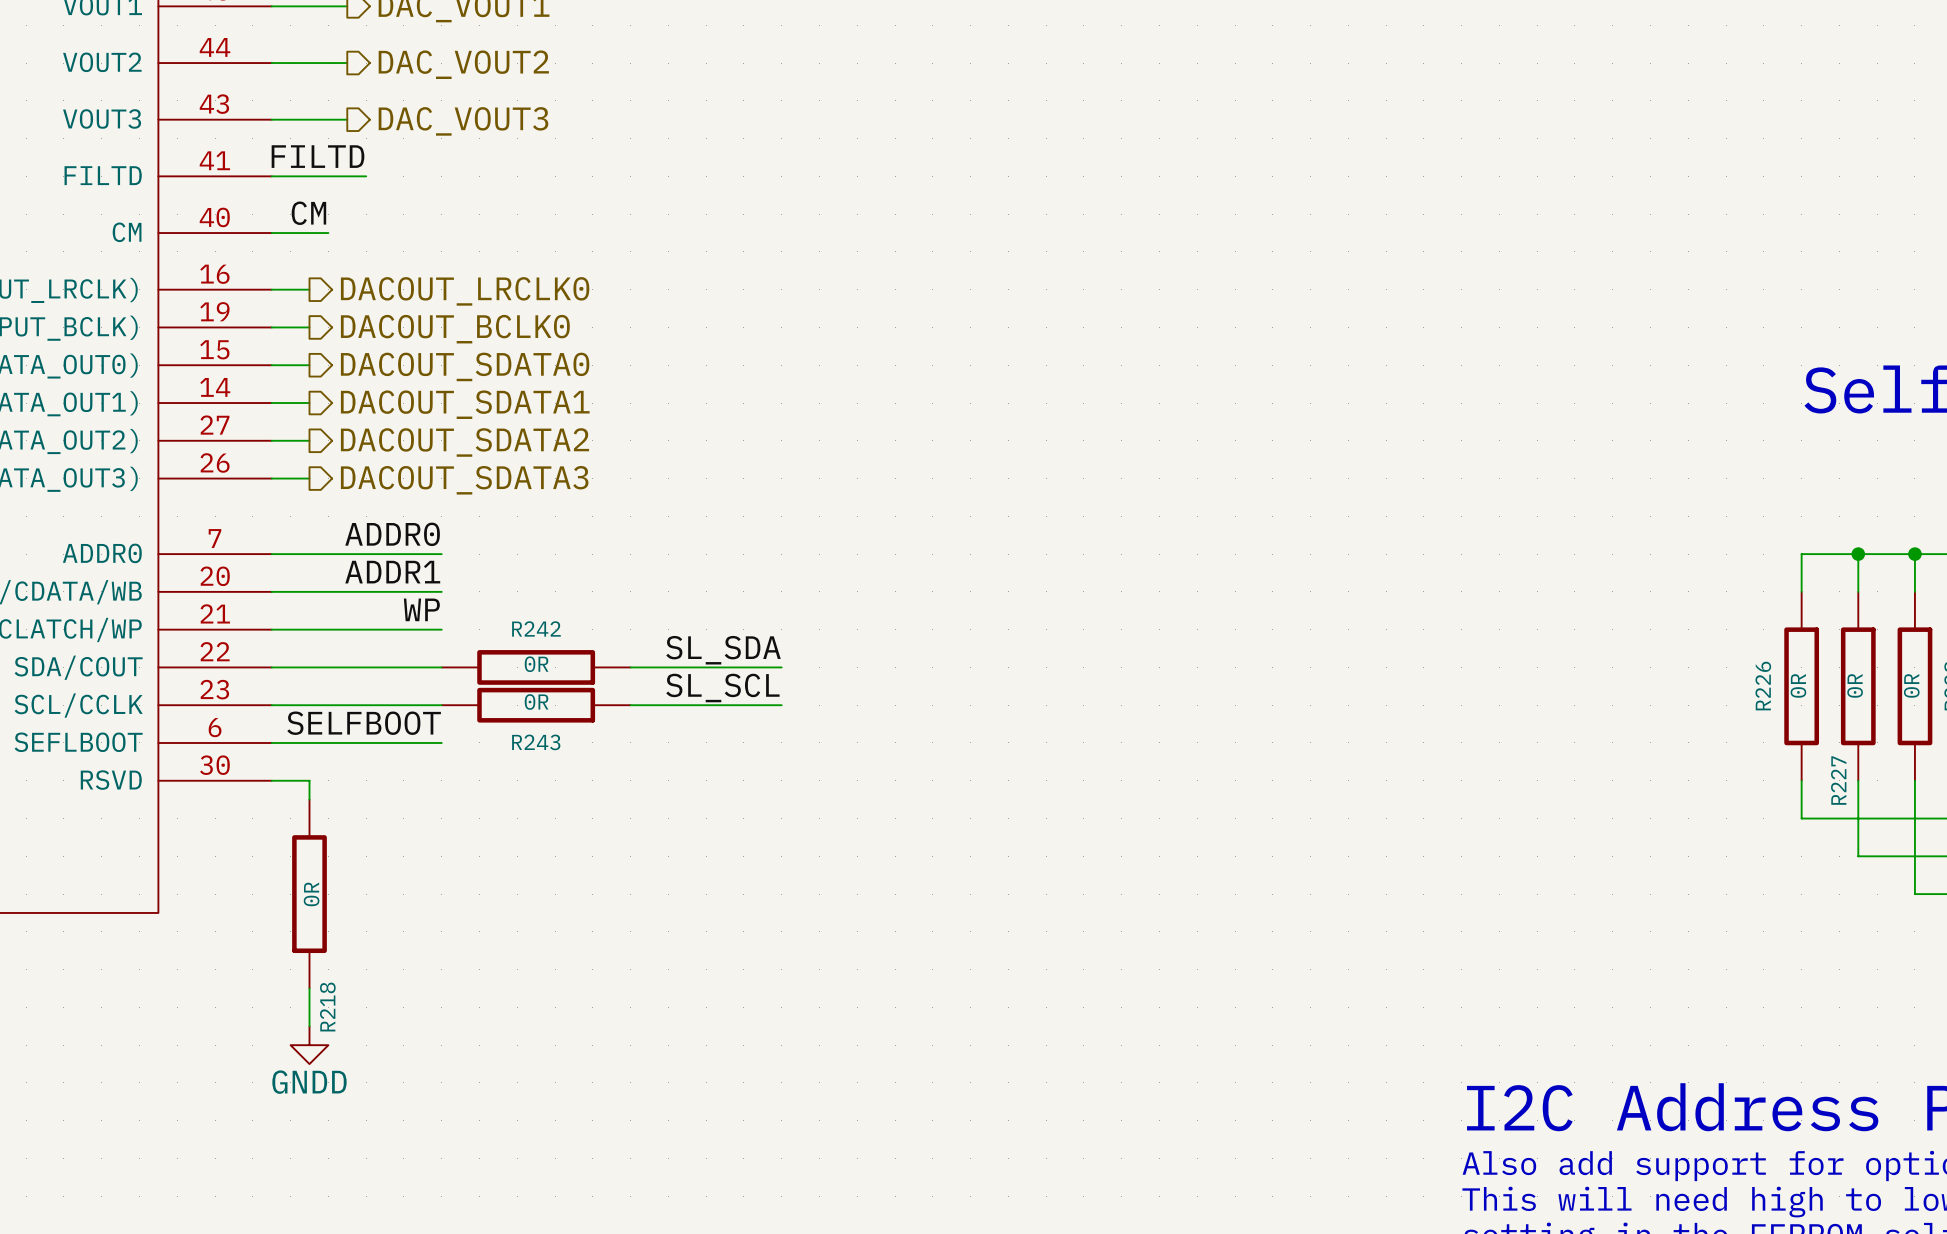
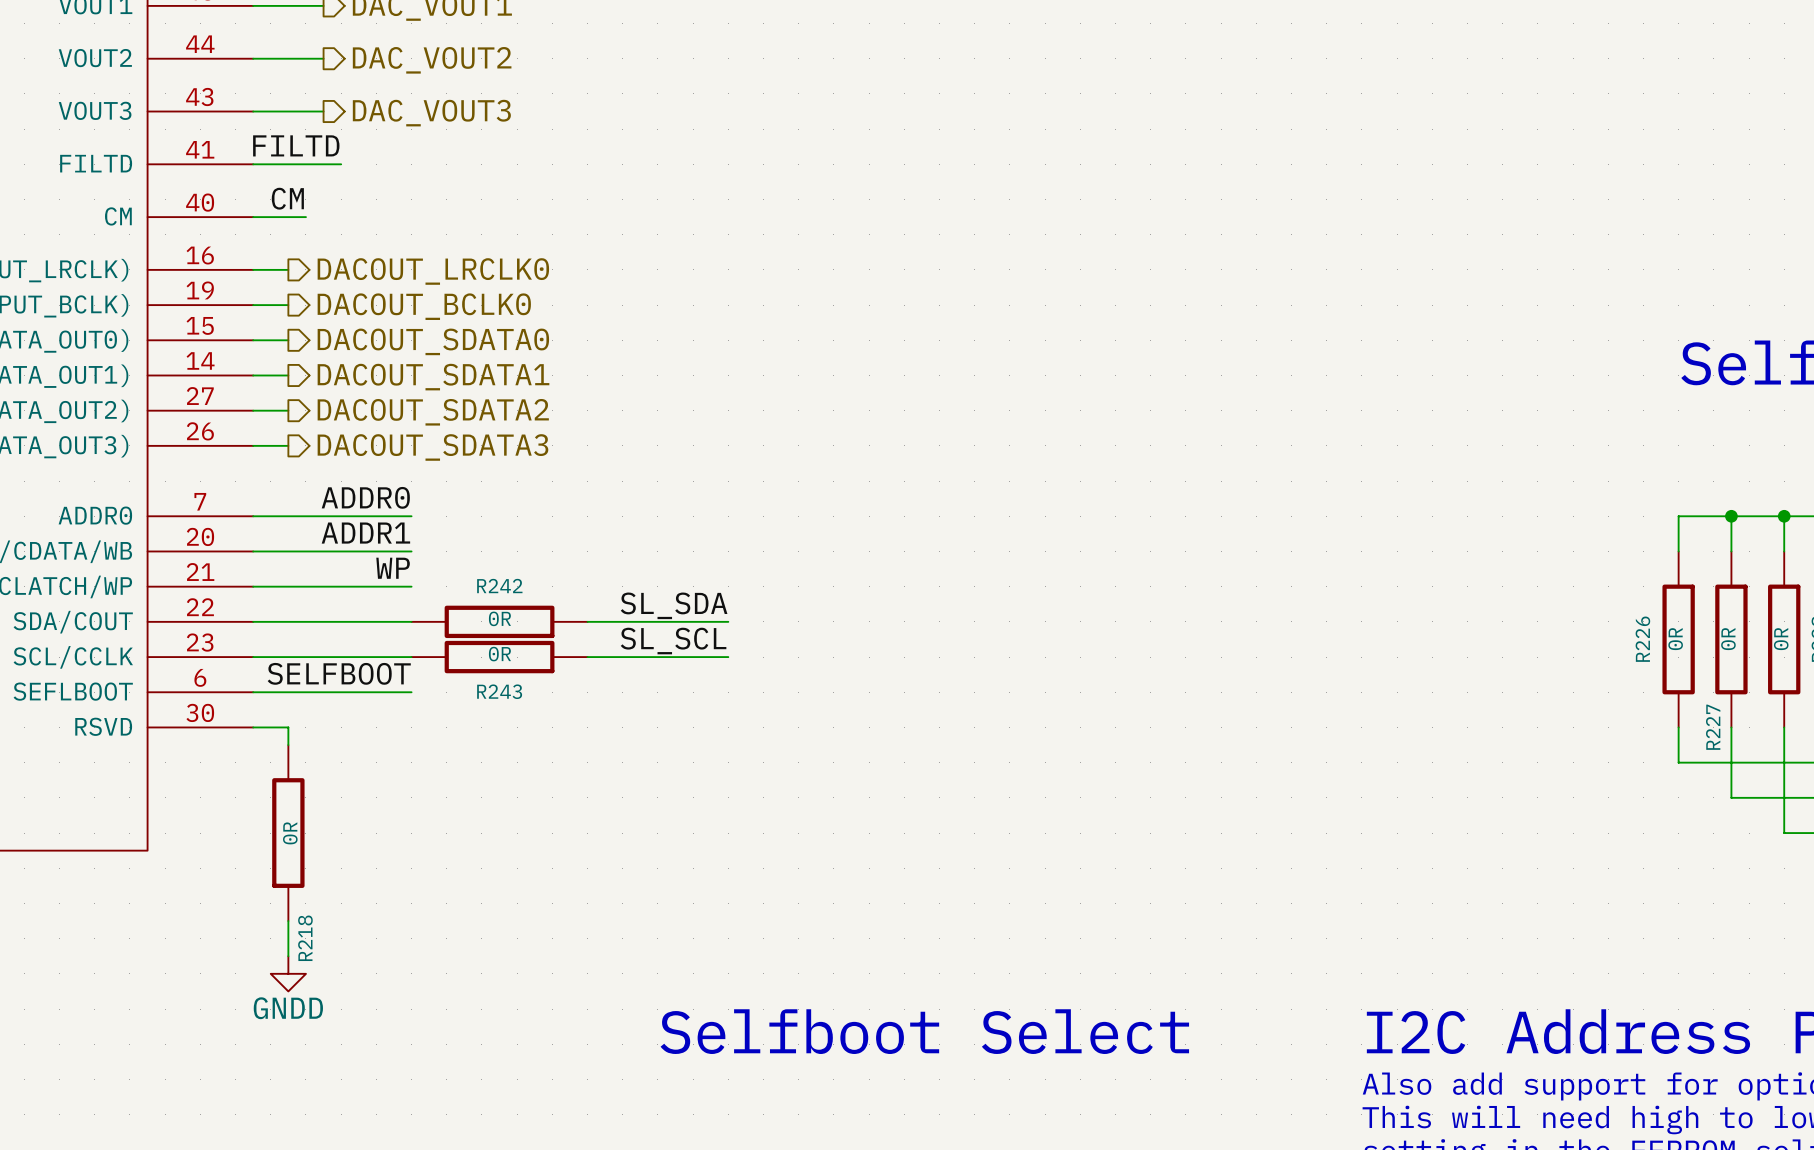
text: none -> Selfboot Select (924, 1031)

